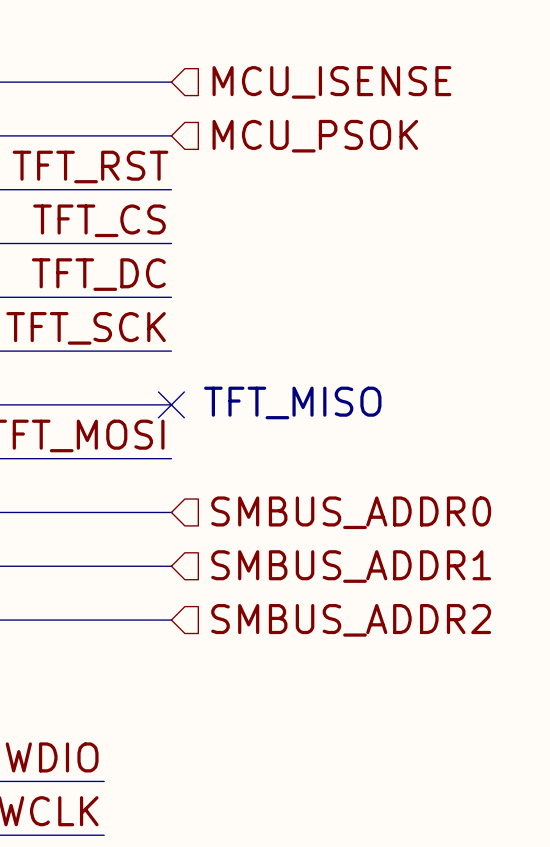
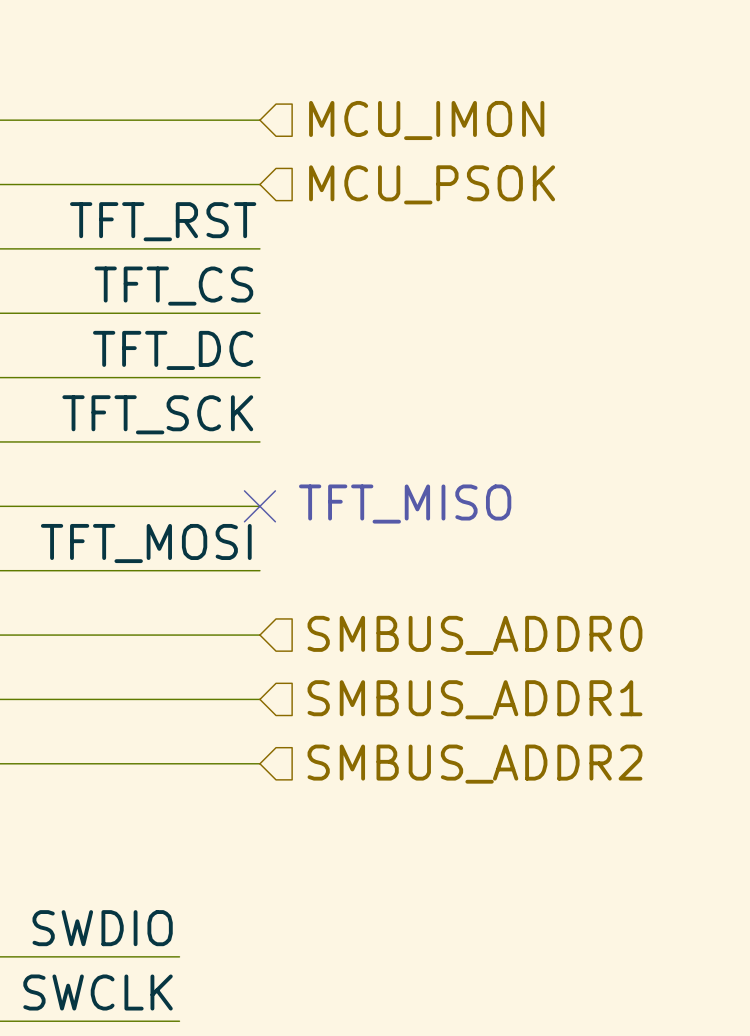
hierarchical label: MCU_ISENSE (331, 82) -> MCU_IMON (426, 120)

